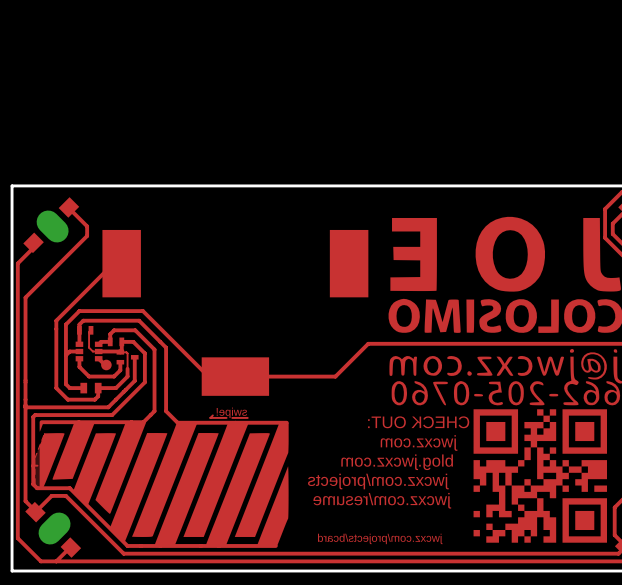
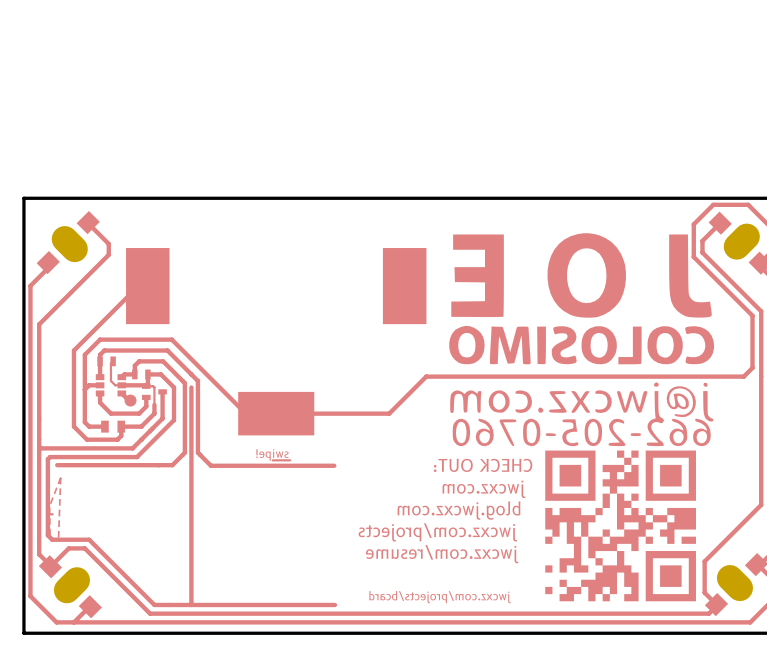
top track: none -> (191, 387) (191, 604)
top track: (212, 415) (210, 417) (226, 417) -> none
part: (164, 484) -> none
top track: none -> (334, 604) (321, 604)

